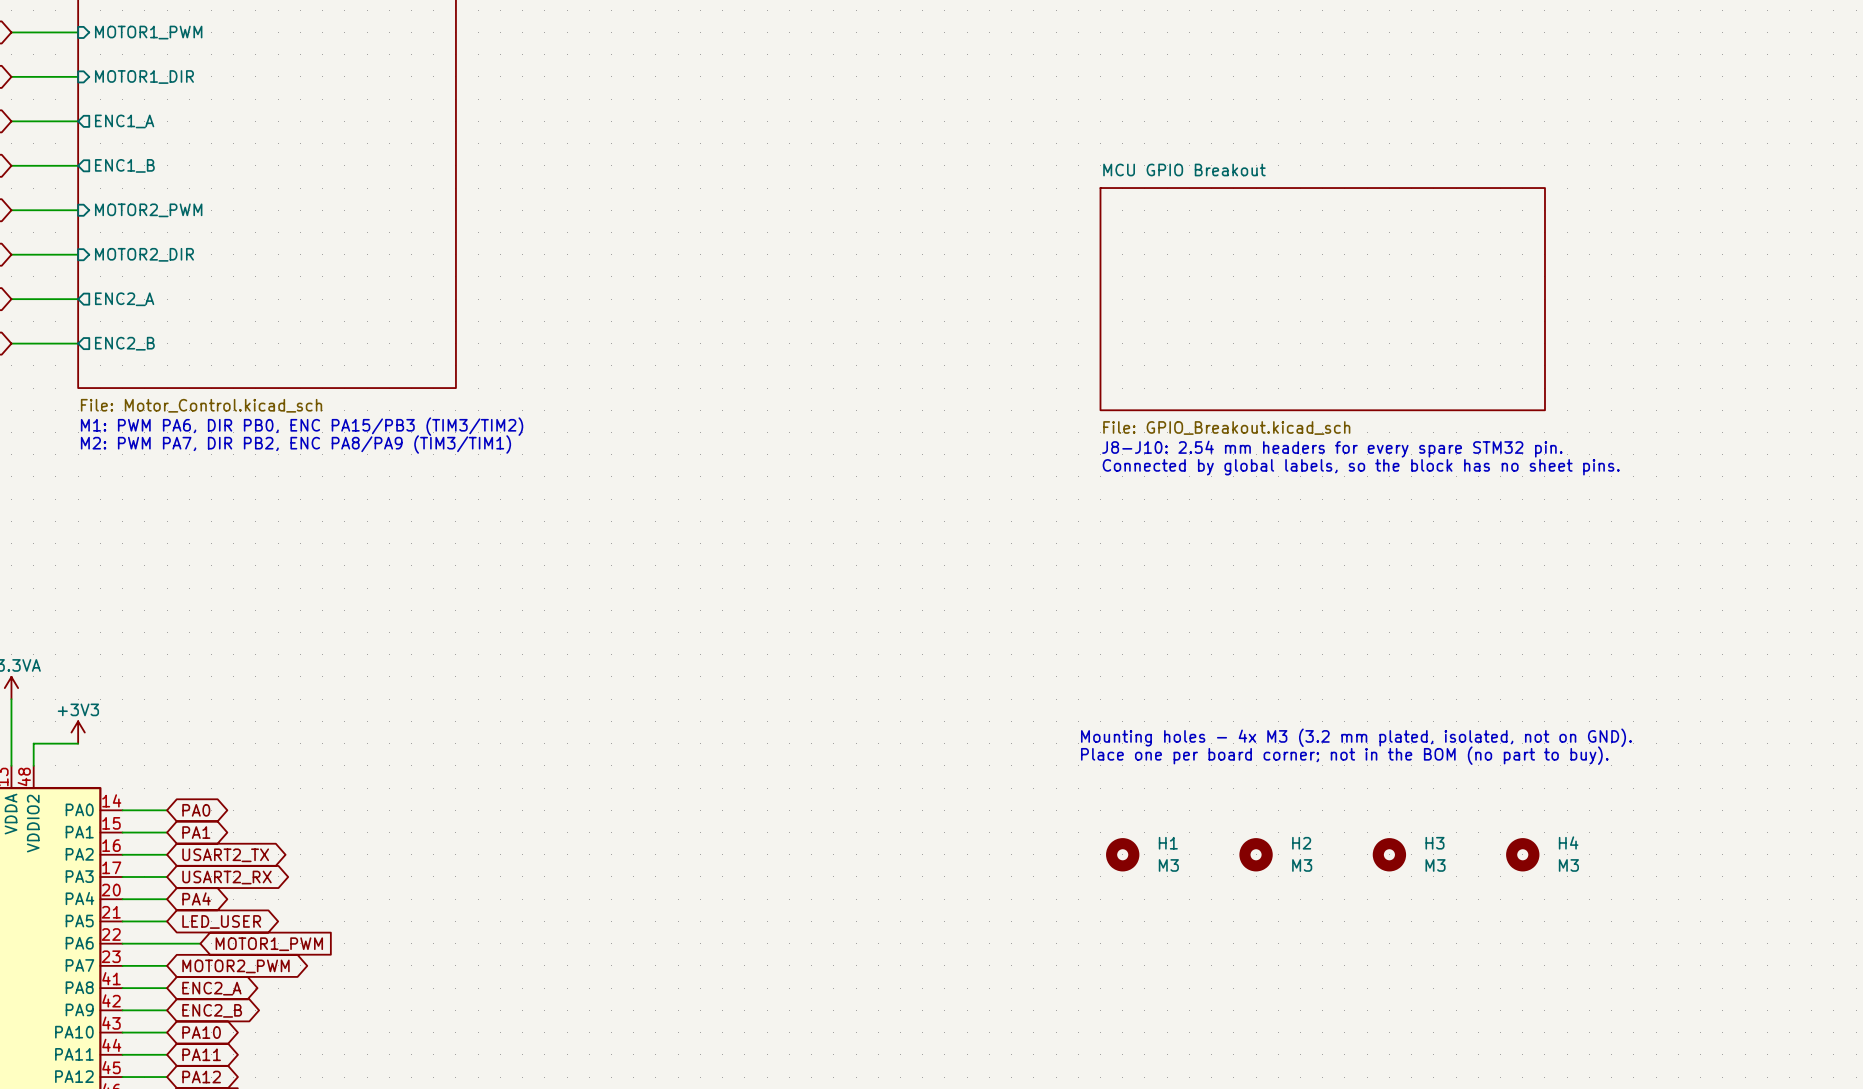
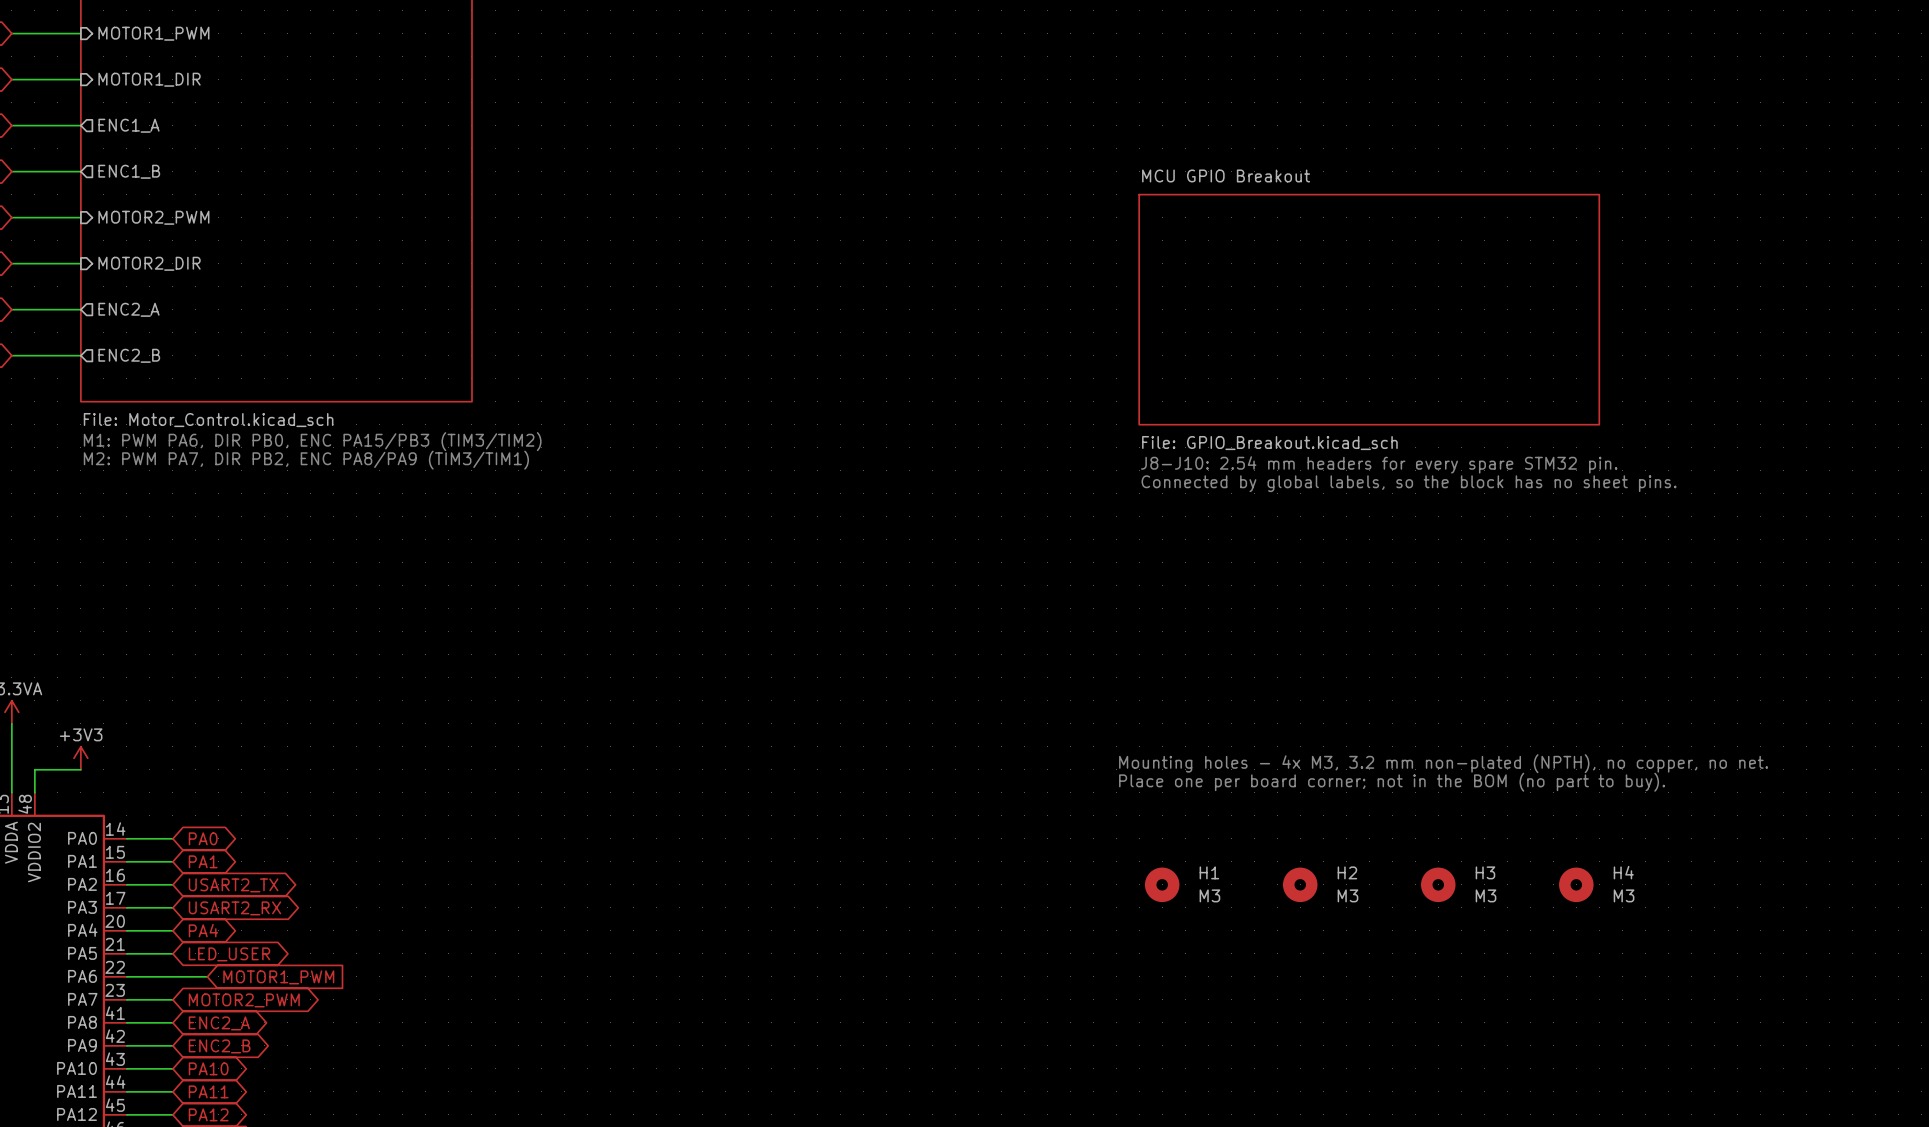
text: Mounting holes - 4x M3 (3.2 mm plated, isolated, not on GND). (1356, 737) -> Mounting holes - 4x M3, 3.2 mm non-plated (NPTH), no copper, no net. (1443, 763)

